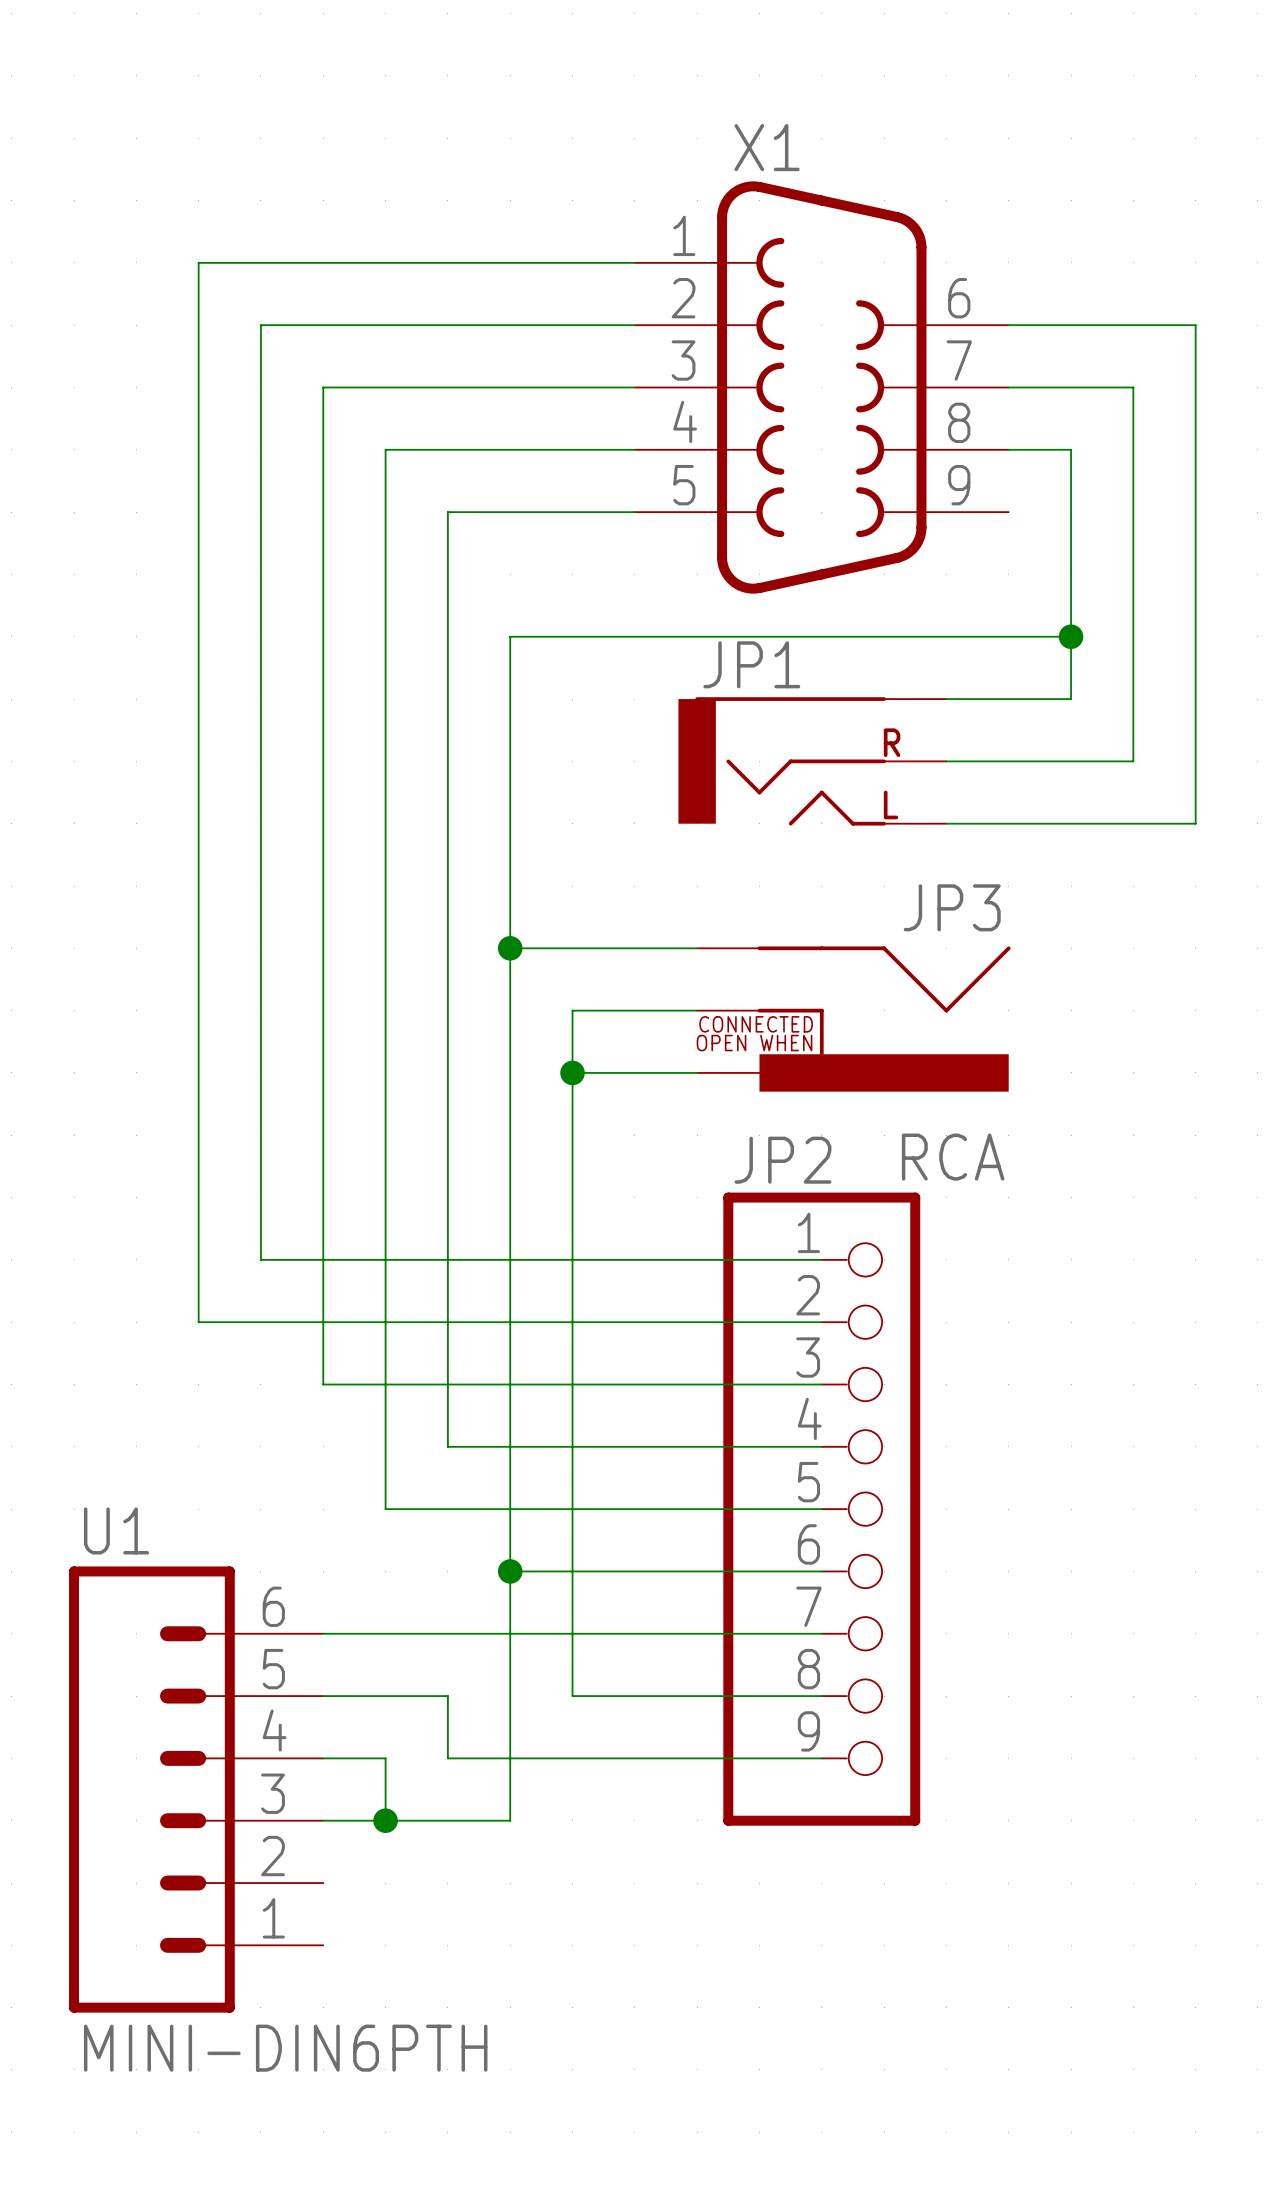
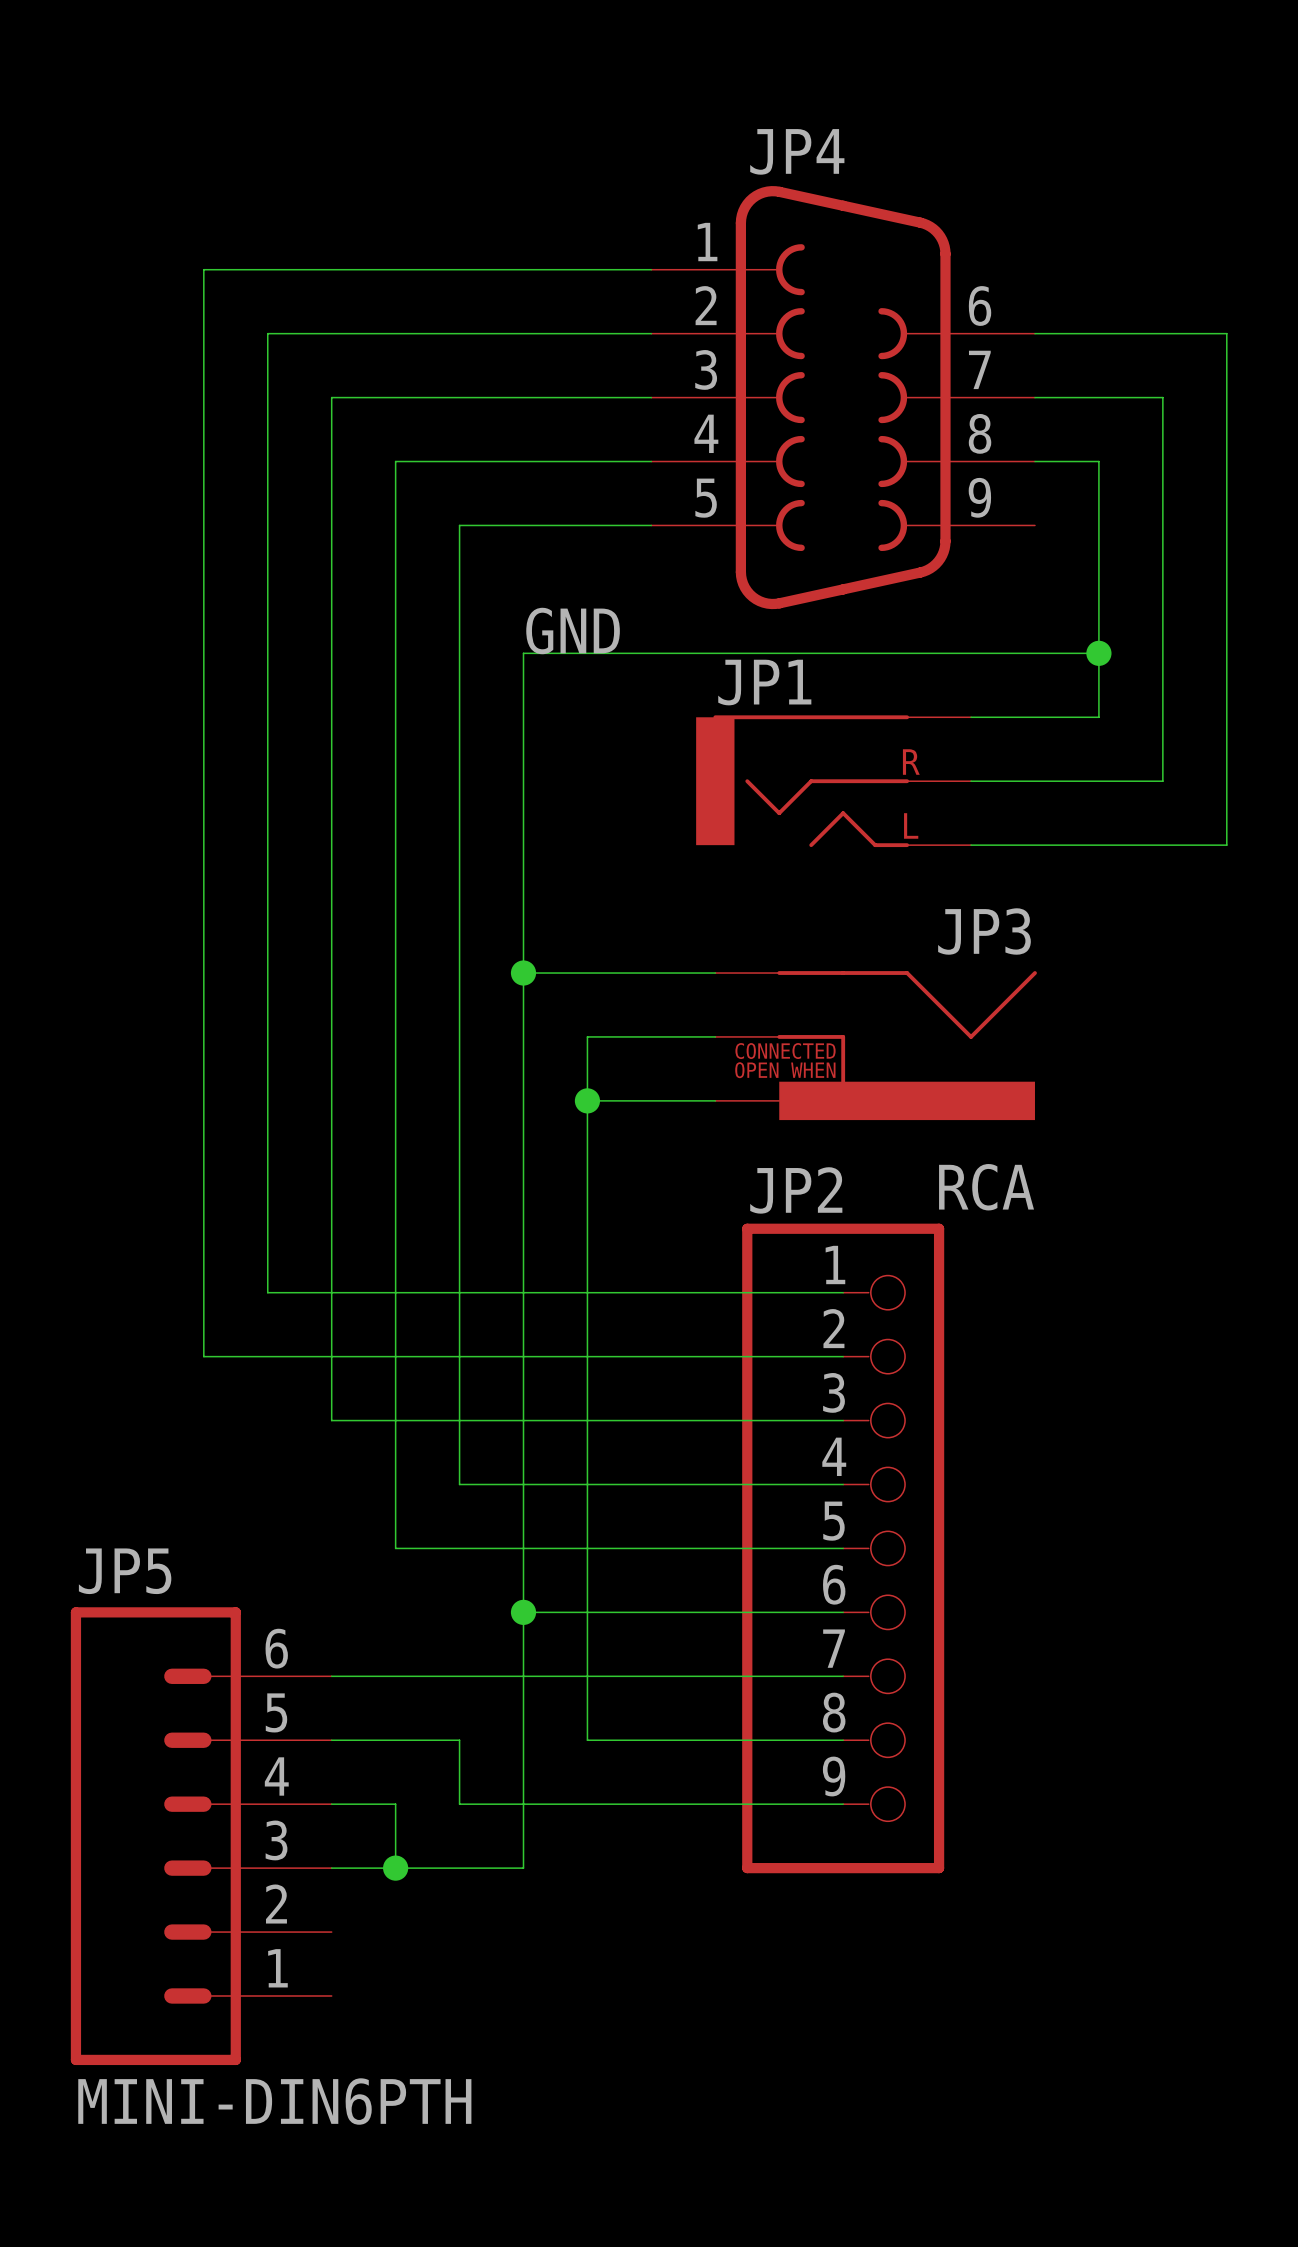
X1 name: X1 (767, 147) -> JP4 (797, 151)
label: none -> GND (573, 630)
U1 name: U1 (116, 1530) -> JP5 (125, 1571)

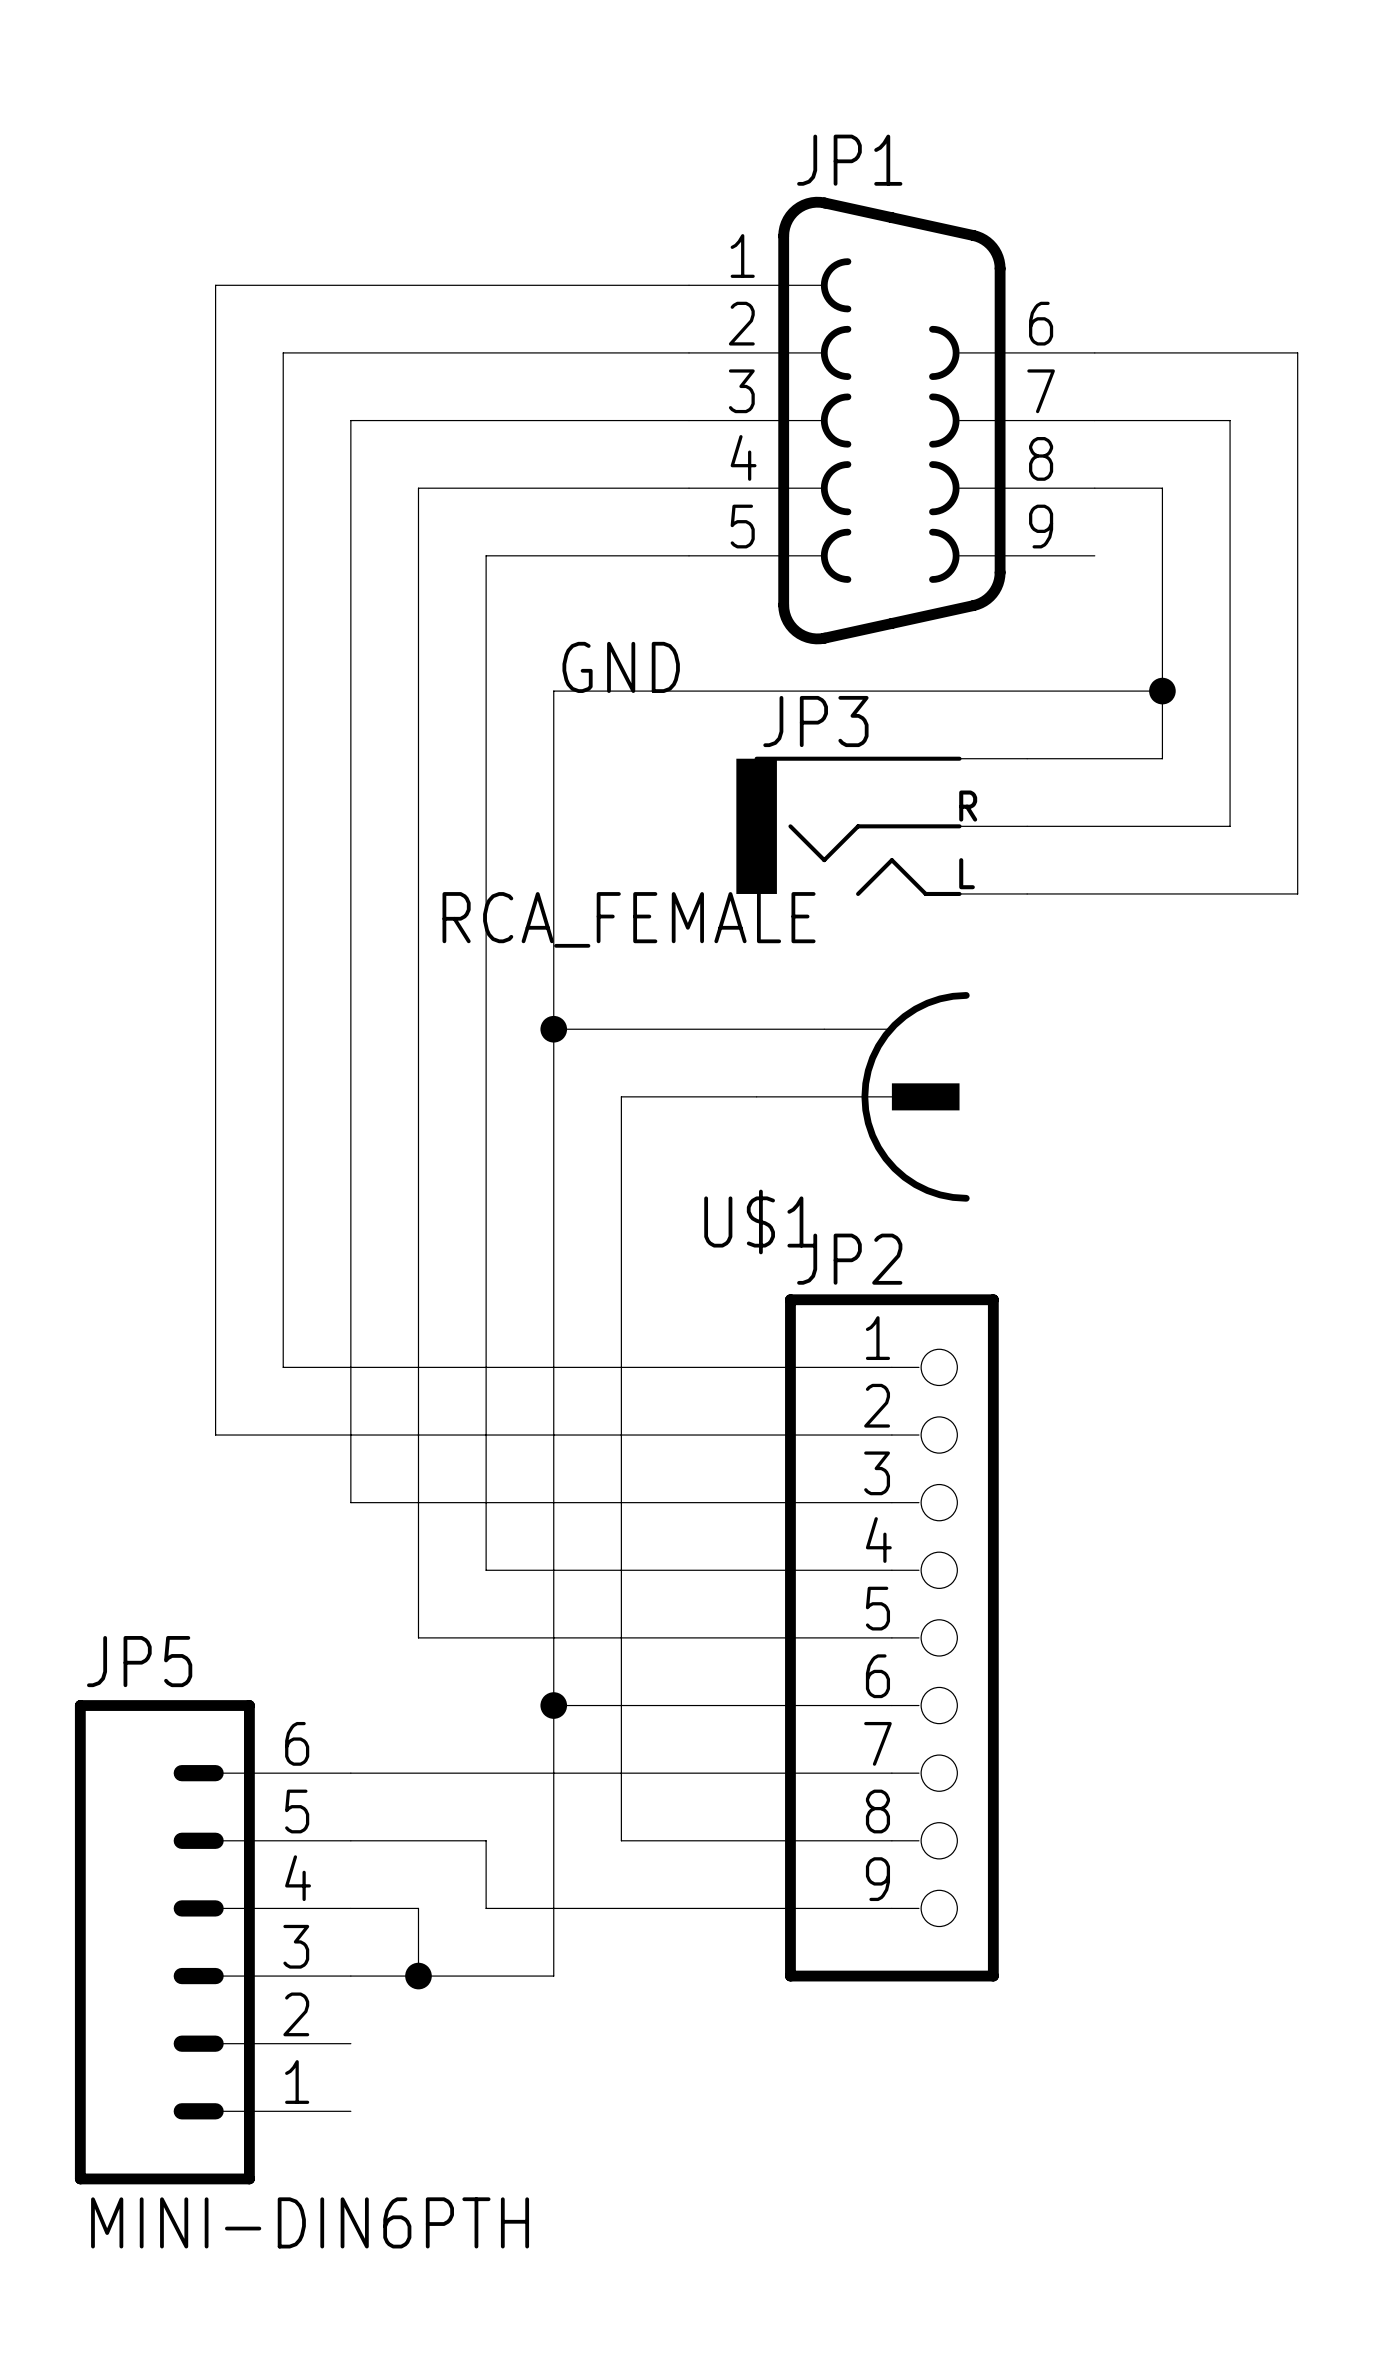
JP4 name: JP4 (797, 151) -> JP1 (849, 160)
JP1 name: JP1 (764, 682) -> JP3 (815, 721)
U$1: none -> RCA_FEMALE (863, 1096)
JP3: RCA (876, 1045) -> none
wire: (587, 1100) (715, 1100) -> none
junction: (587, 1100) -> none

